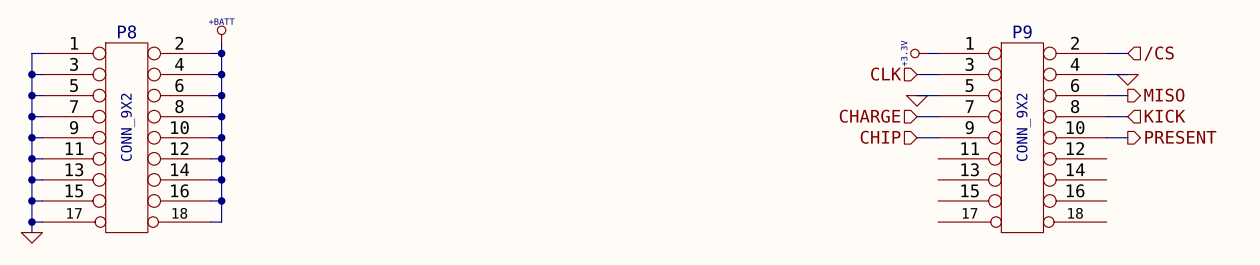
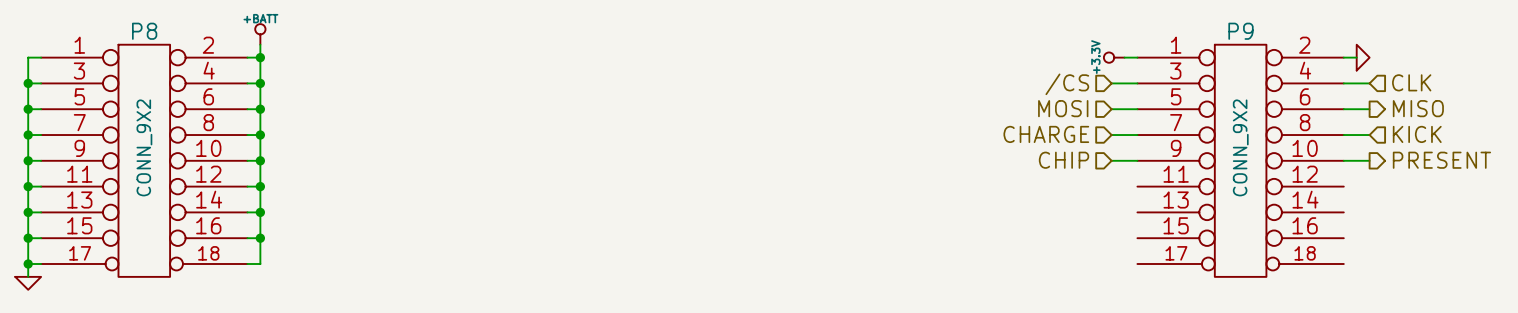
wire: (1117, 53) (1127, 53) -> none
hierarchical label: /CS (1159, 53) -> none
hierarchical label: CLK (886, 74) -> /CS (1067, 84)
hierarchical label: none -> CLK (1411, 82)
power symbol rotation: 0° (1127, 79) -> 90° counterclockwise (1363, 57)
power symbol position: (1127, 79) -> (1363, 57)
hierarchical label: none -> MOSI (1063, 108)
power symbol: (917, 100) -> none

